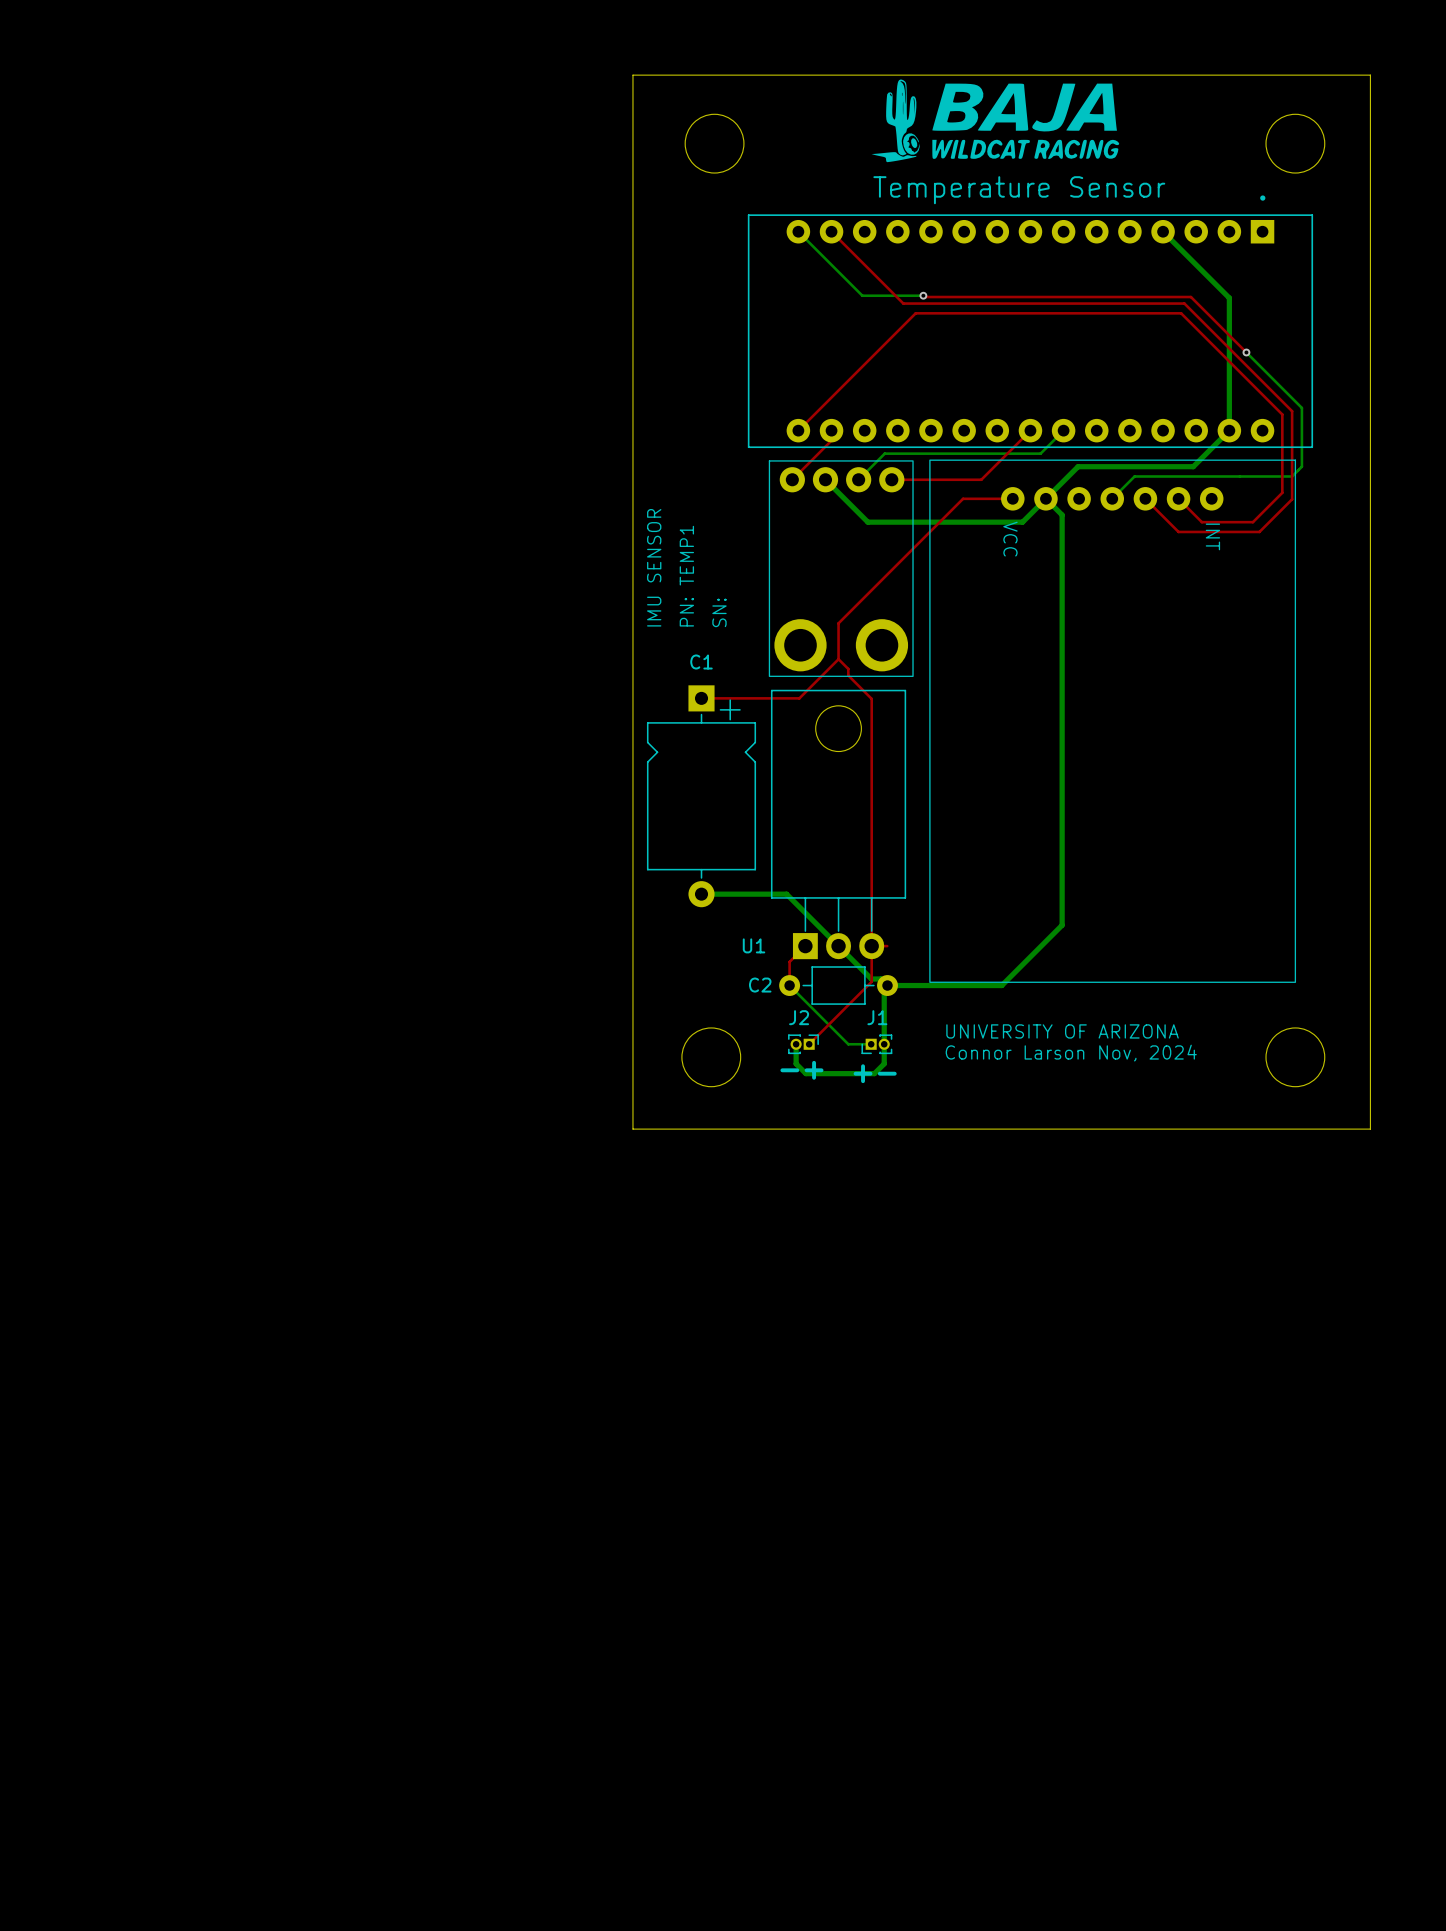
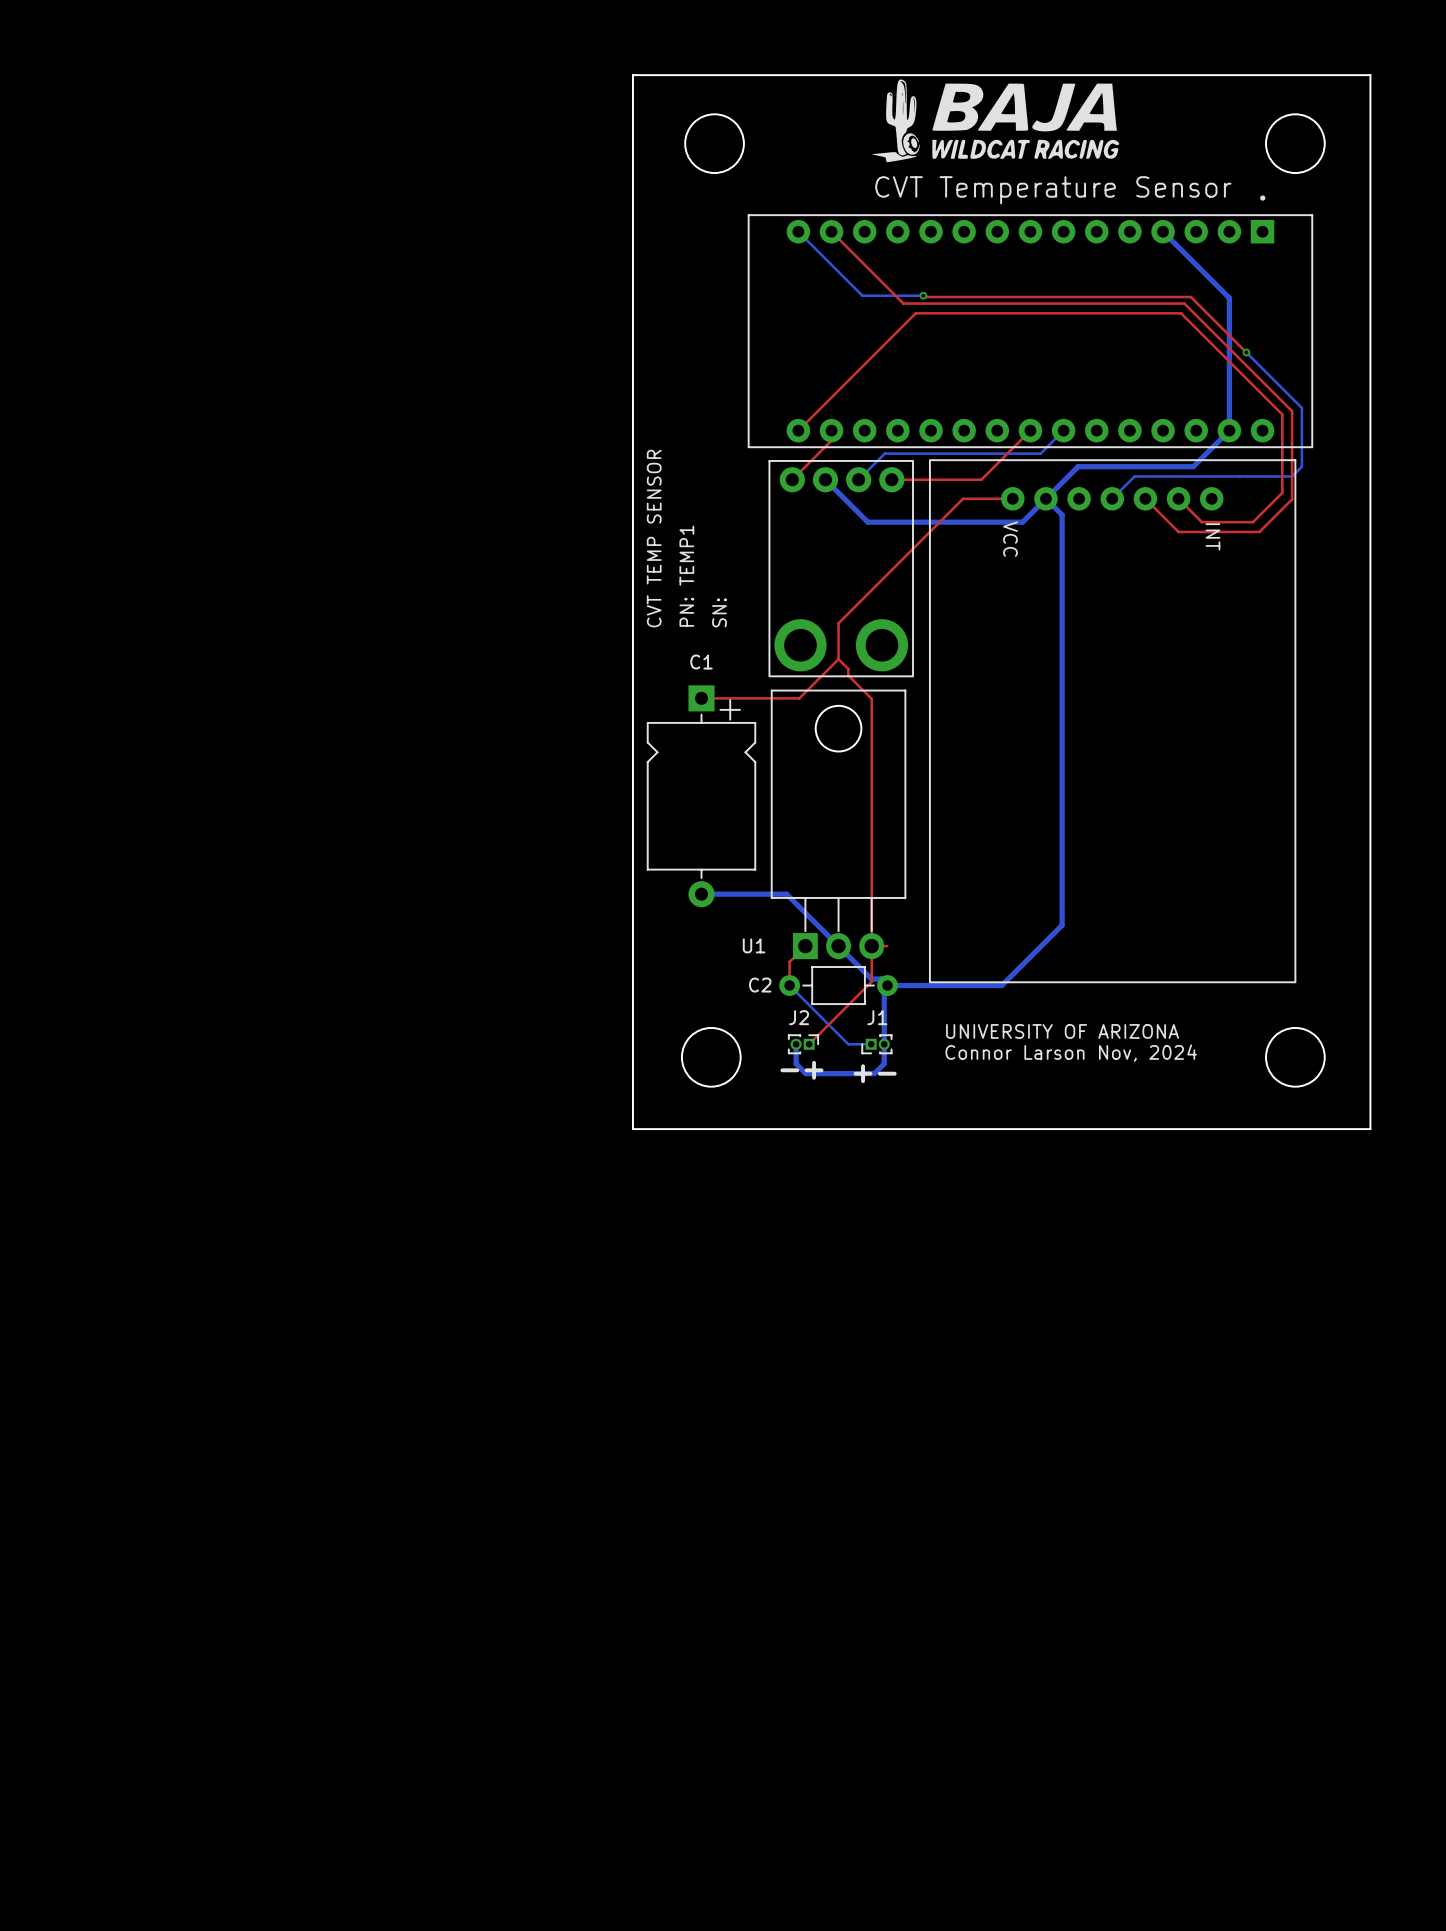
text: Temperature Sensor (1019, 190) -> CVT Temperature Sensor (1053, 190)
text: IMU SENSOR (654, 567) -> CVT TEMP SENSOR (654, 538)

